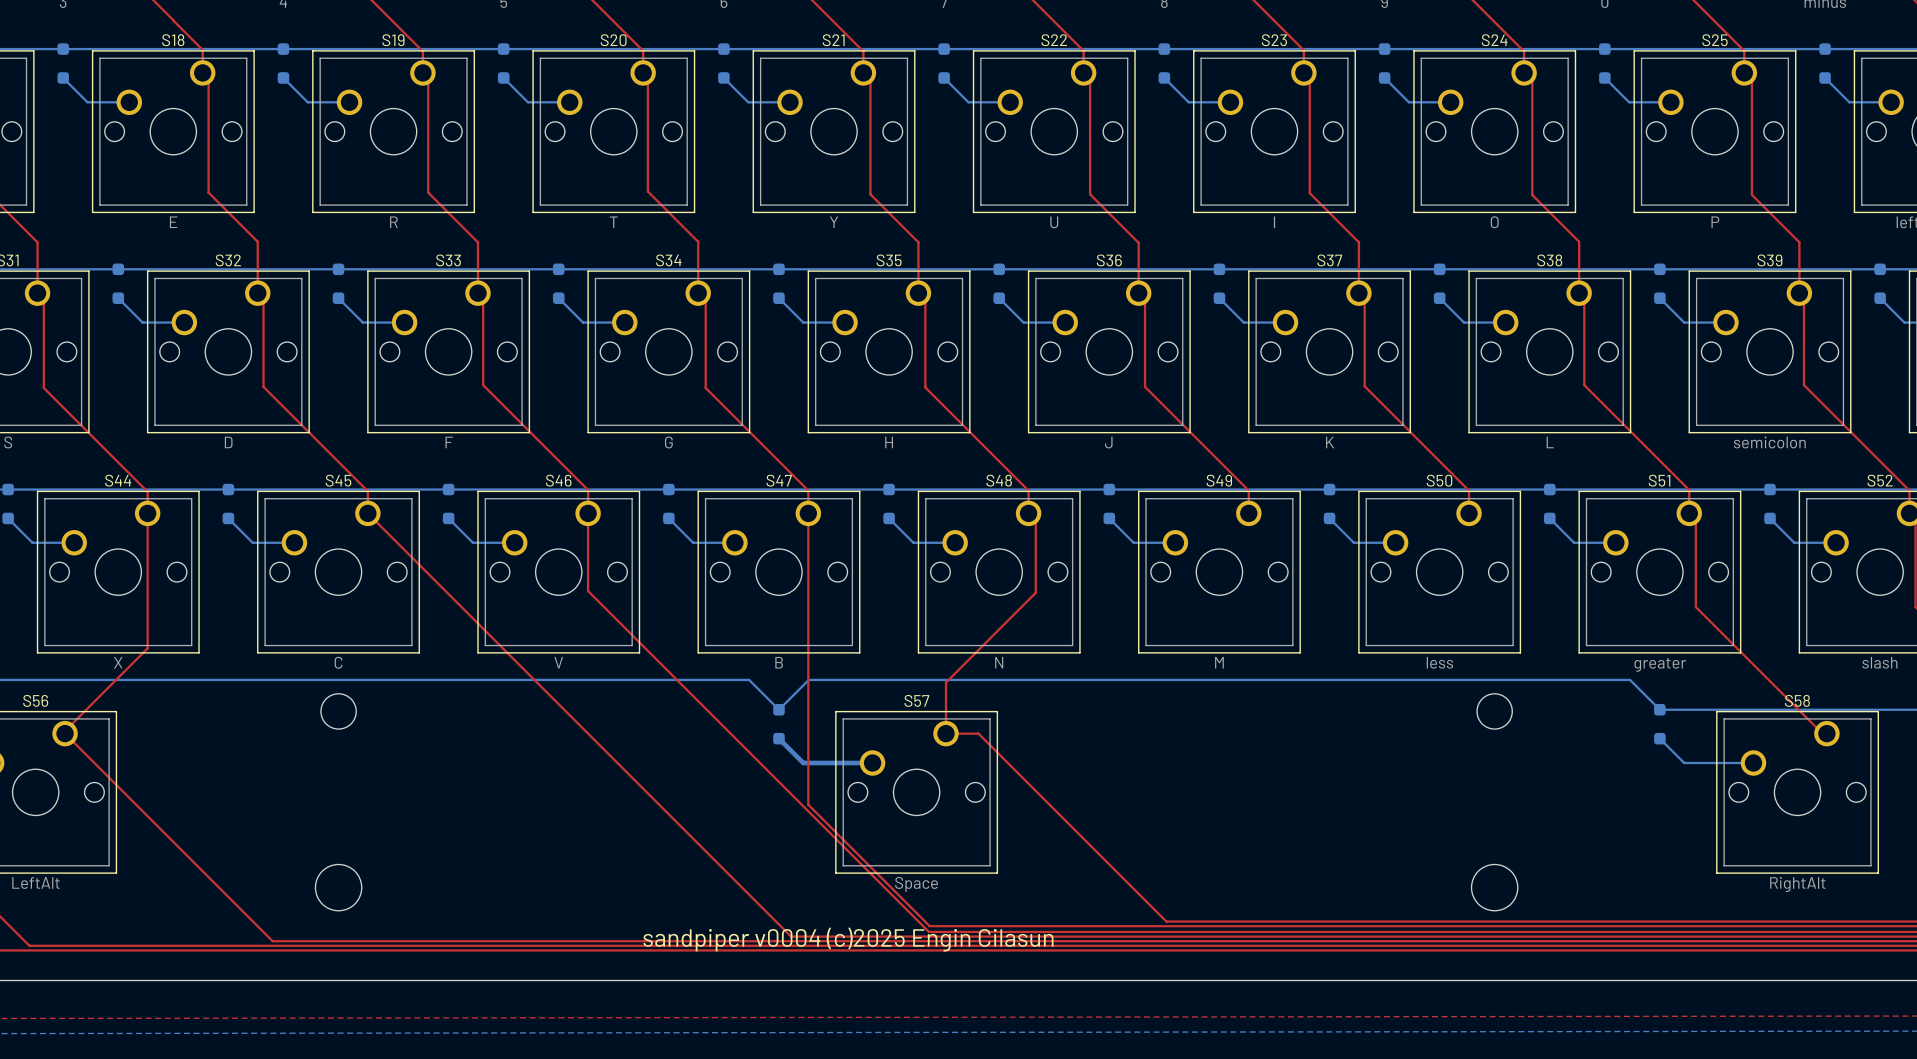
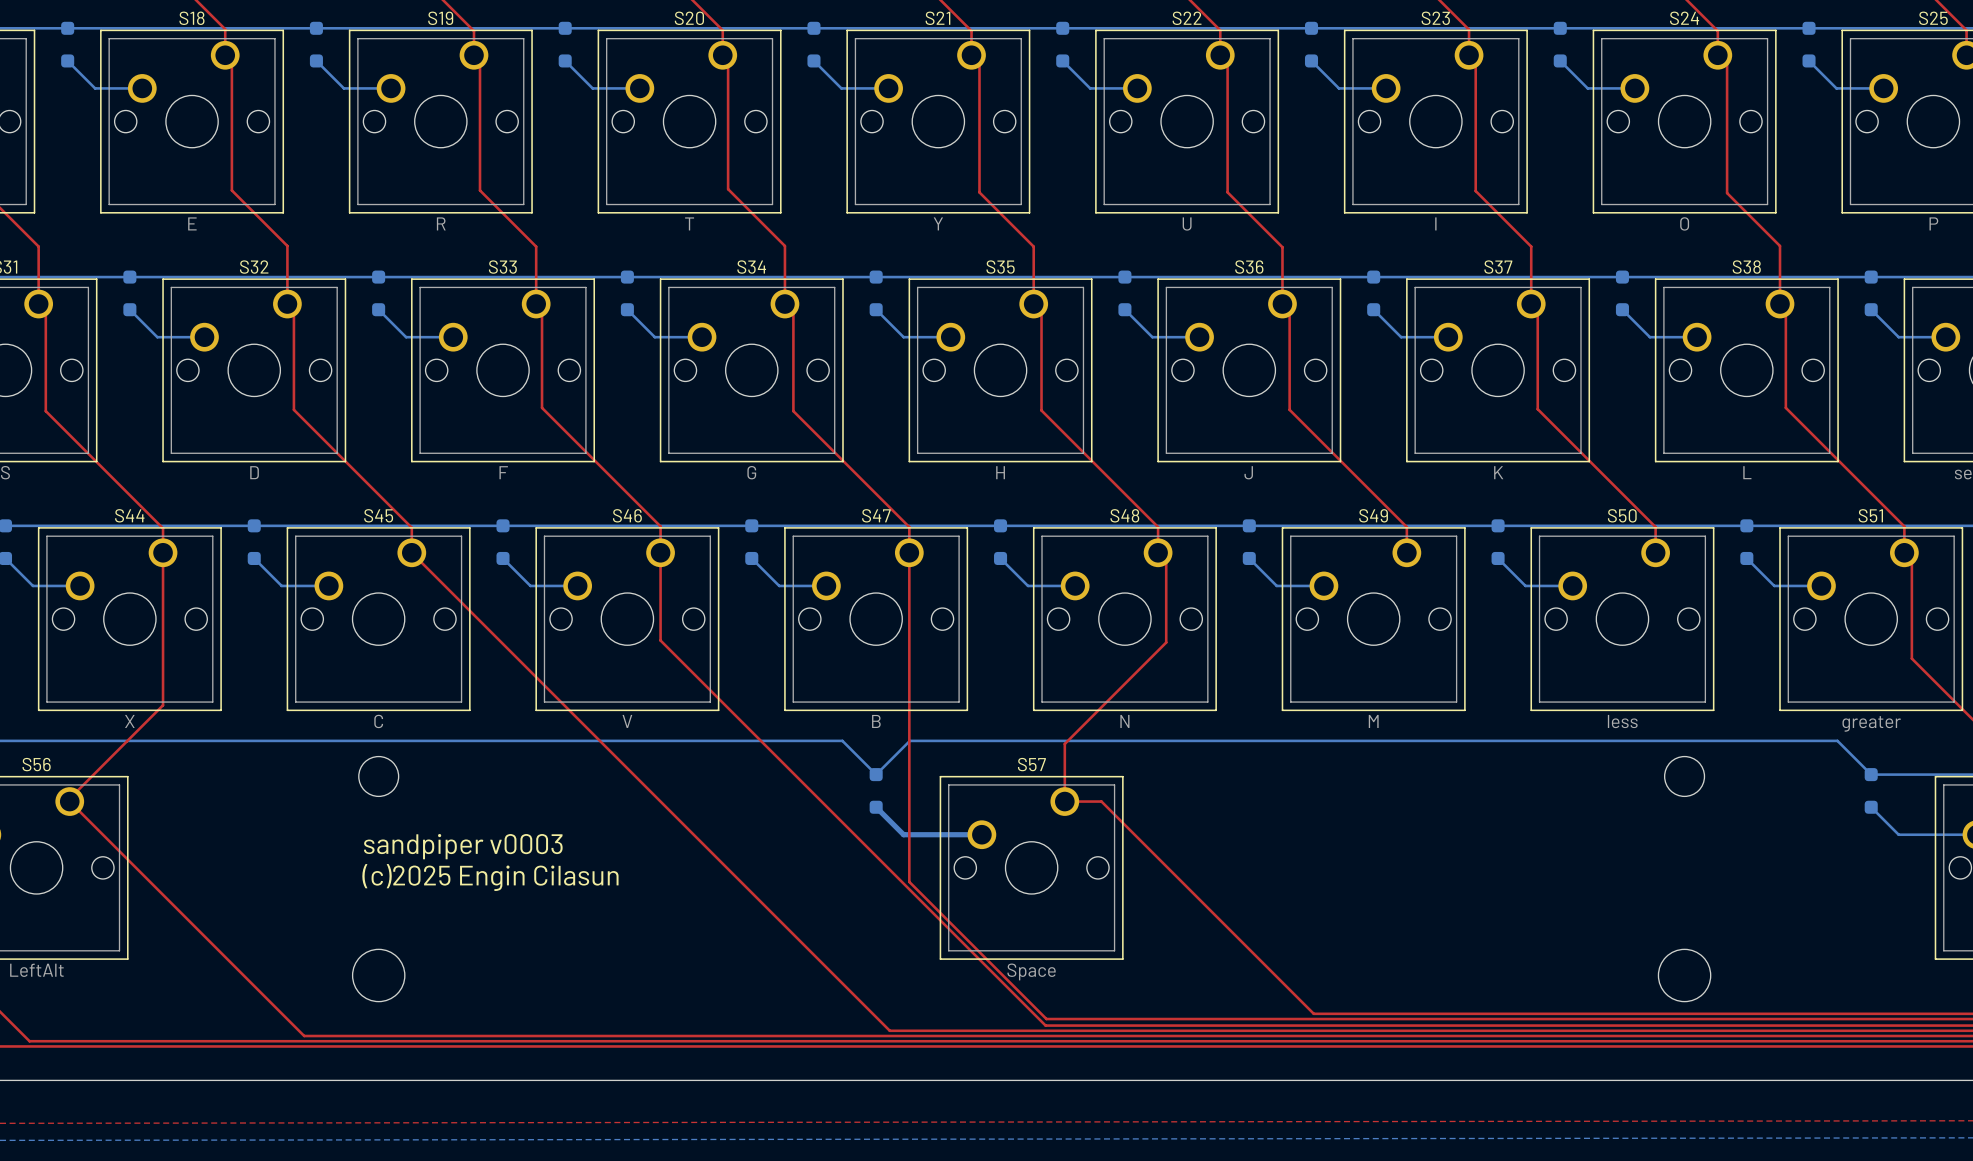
text: none -> sandpiper v0003 (463, 846)
text: none -> (c)2025 Engin Cilasun (490, 877)
text: sandpiper v0004 (c)2025 Engin Cilasun (848, 939) -> none

